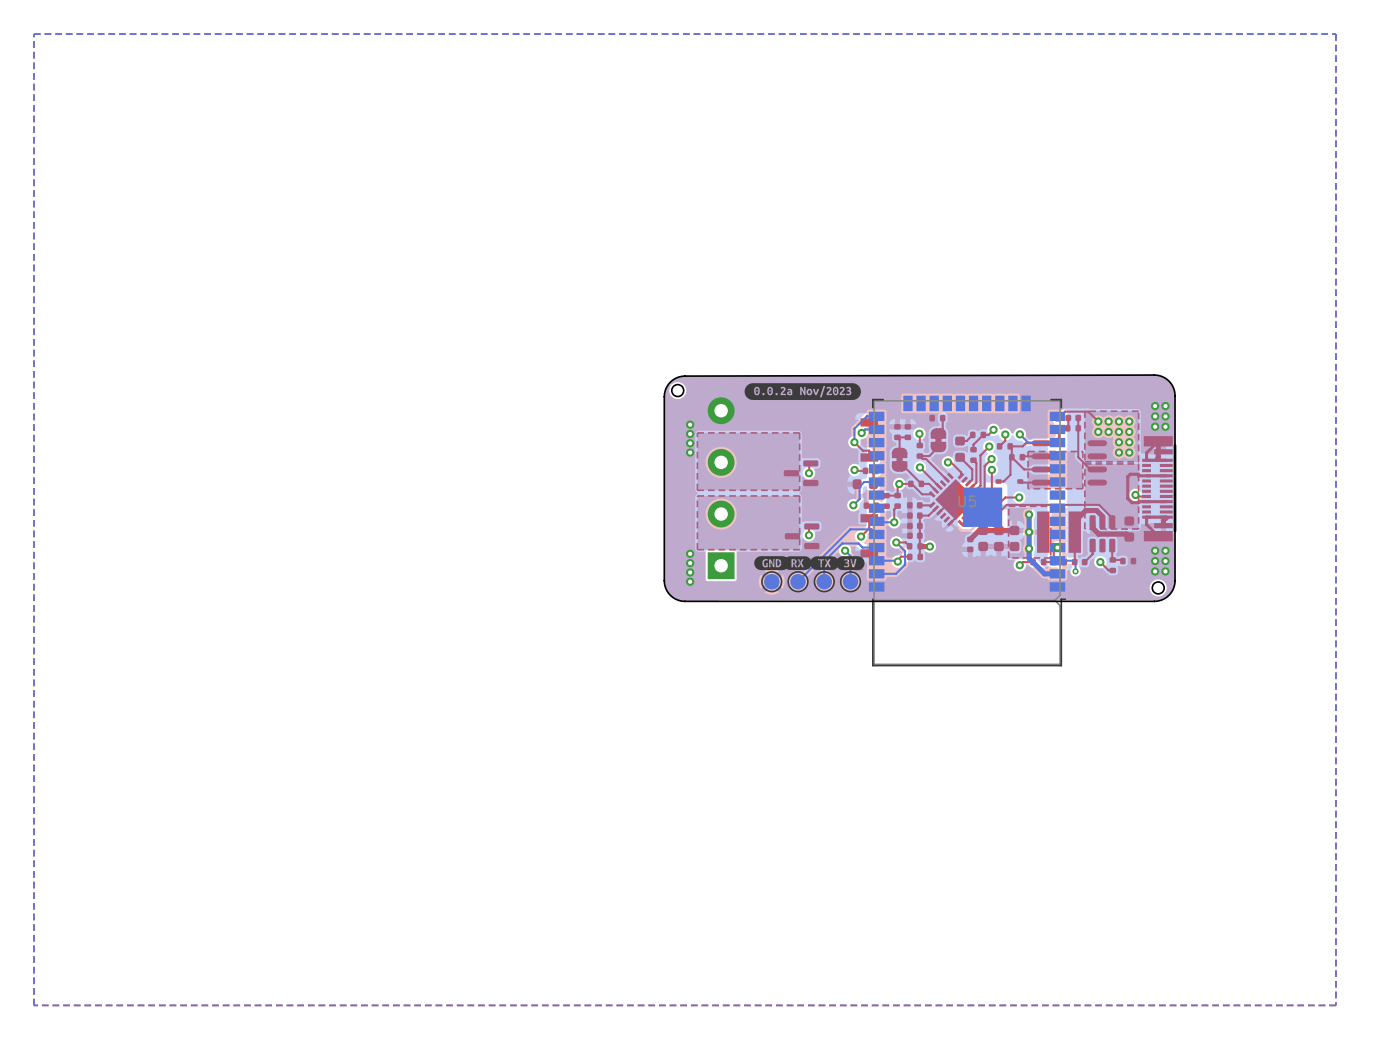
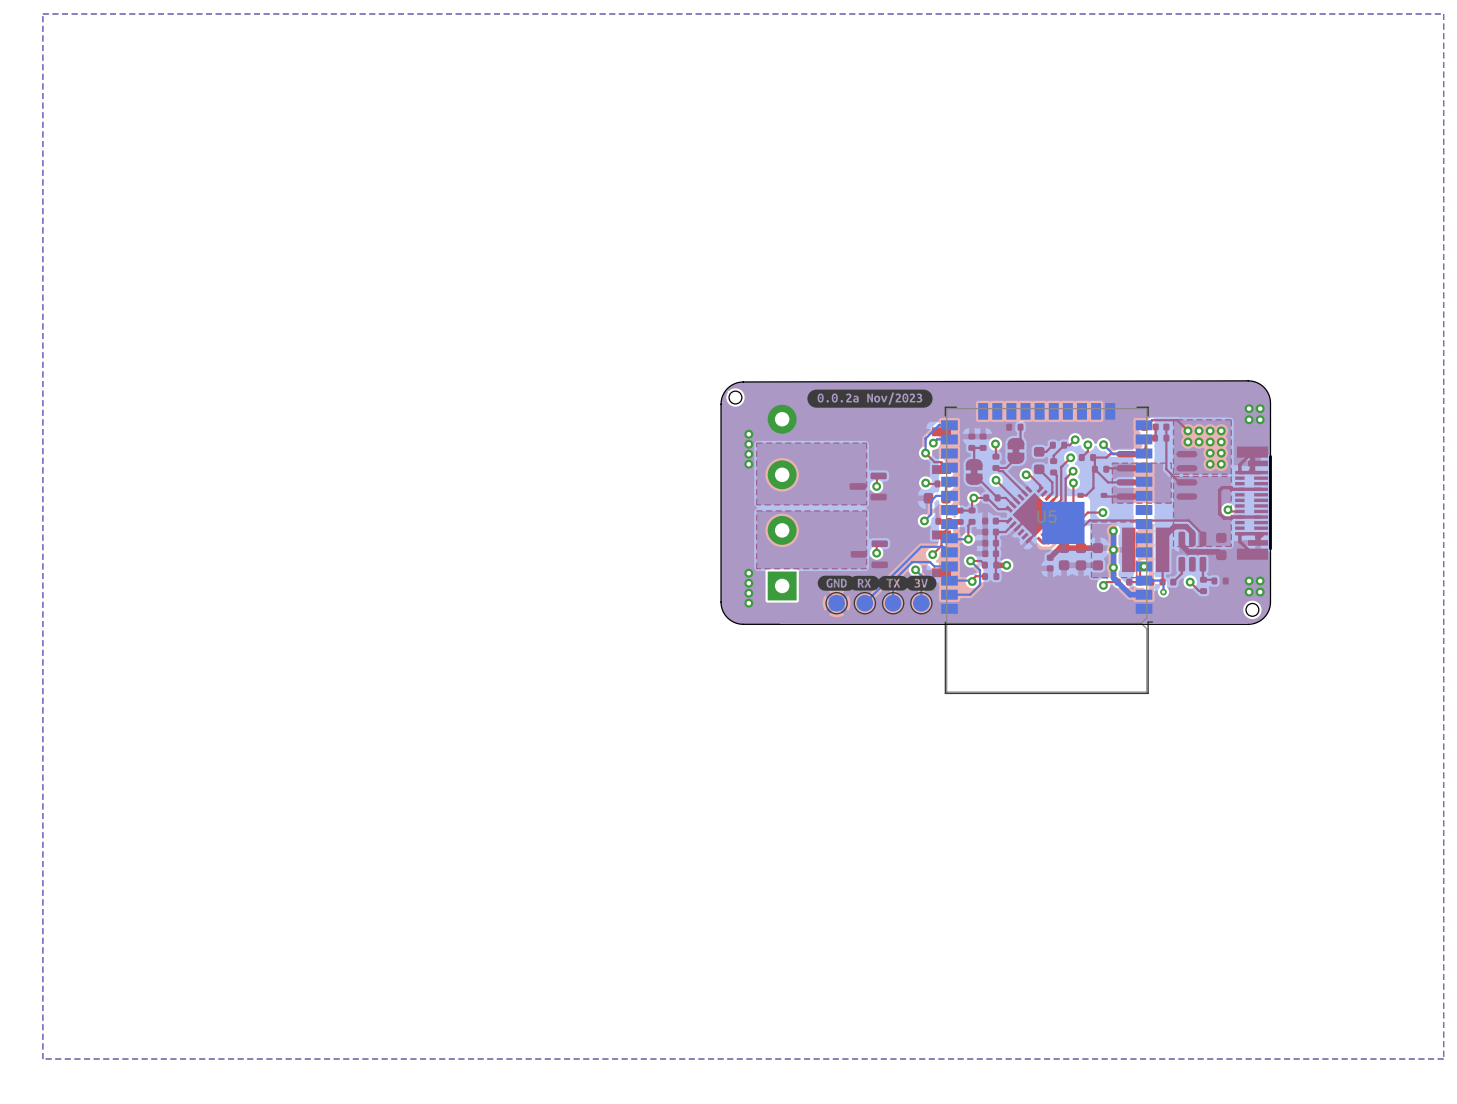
via: none -> (1249, 408)
via: none -> (1260, 408)
via: (1155, 406) -> none
via: (1165, 406) -> none
via: none -> (1249, 419)
via: none -> (1260, 419)
via: (1155, 416) -> none
via: (1165, 416) -> none
via: (1155, 426) -> none
via: (1165, 426) -> none
via: (1155, 550) -> none
via: (1165, 550) -> none

